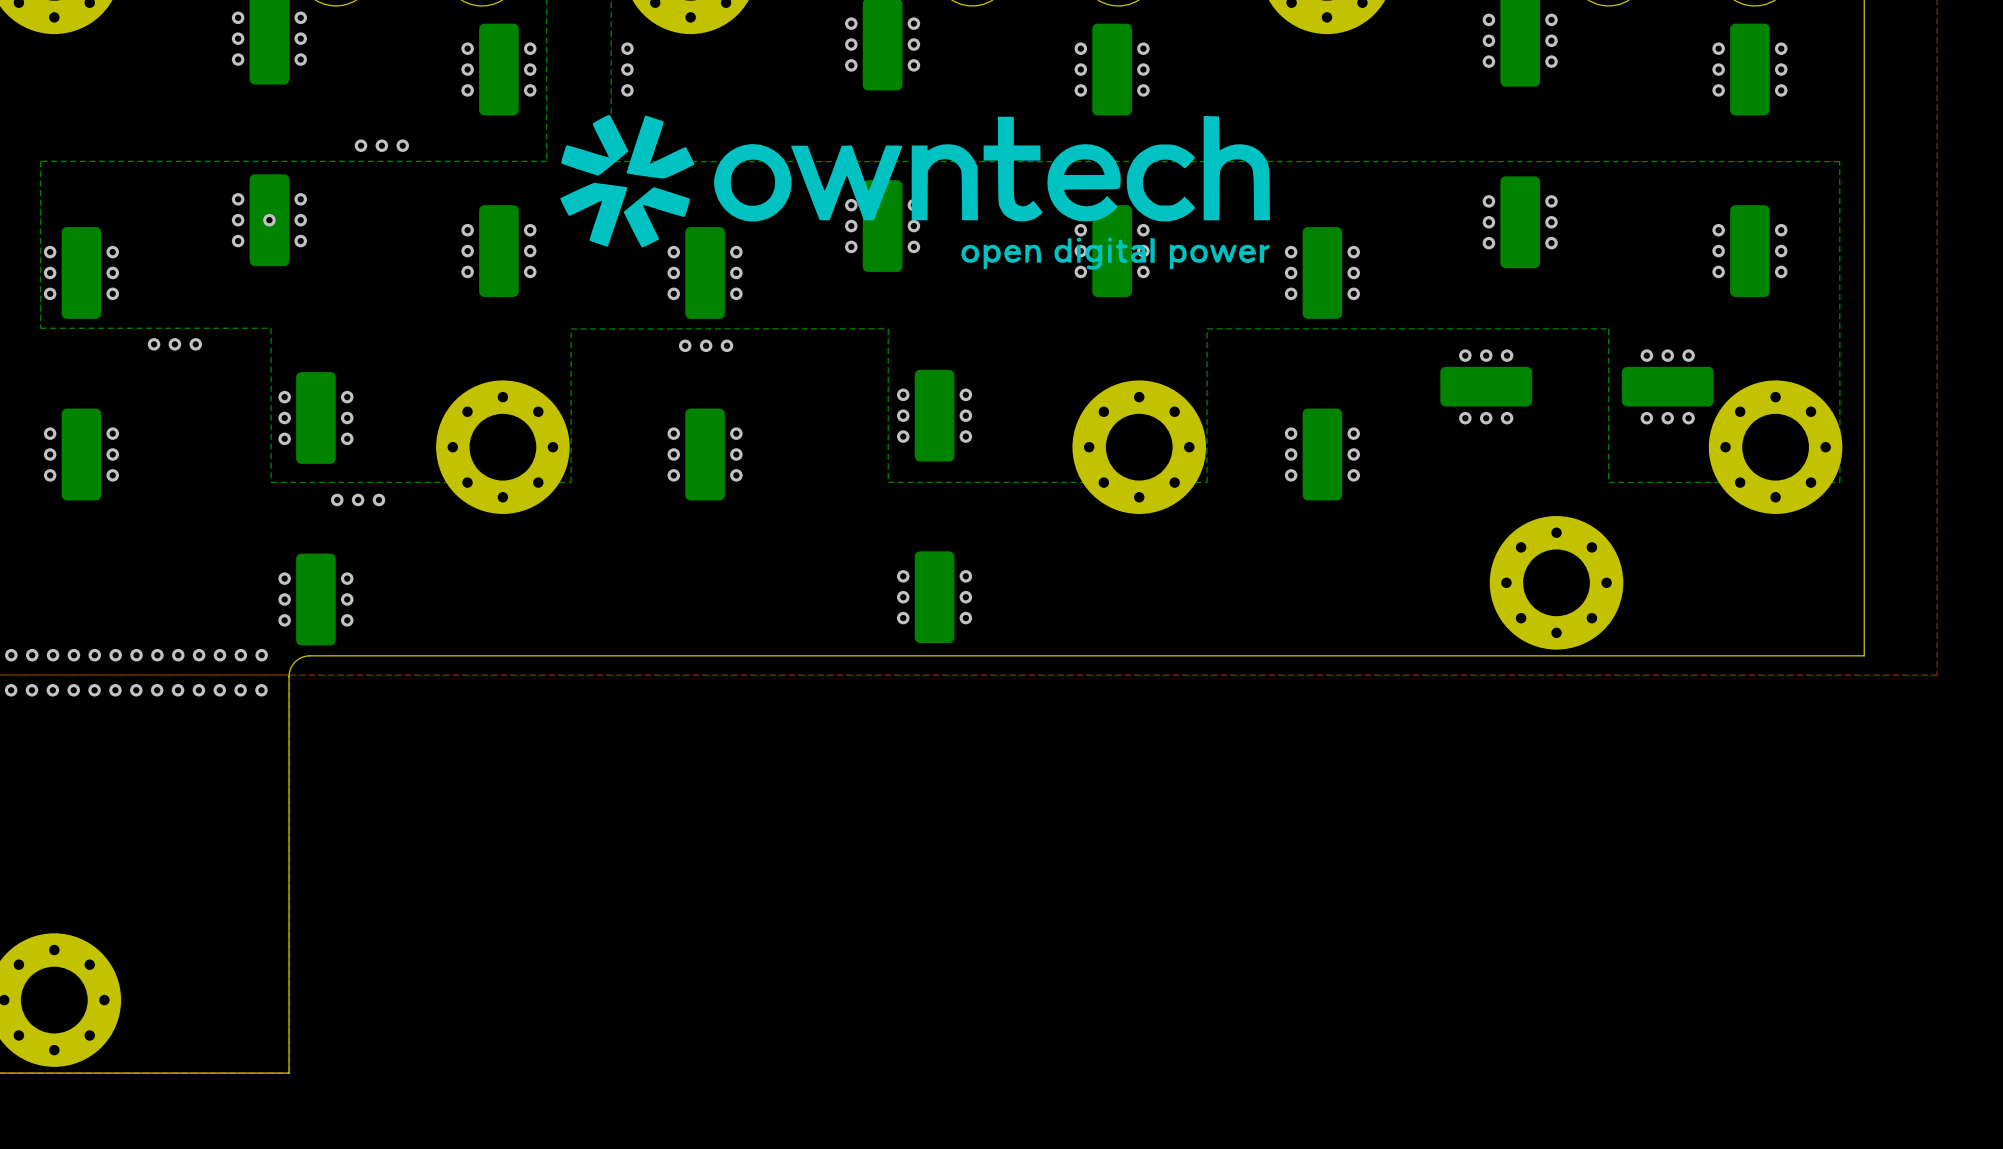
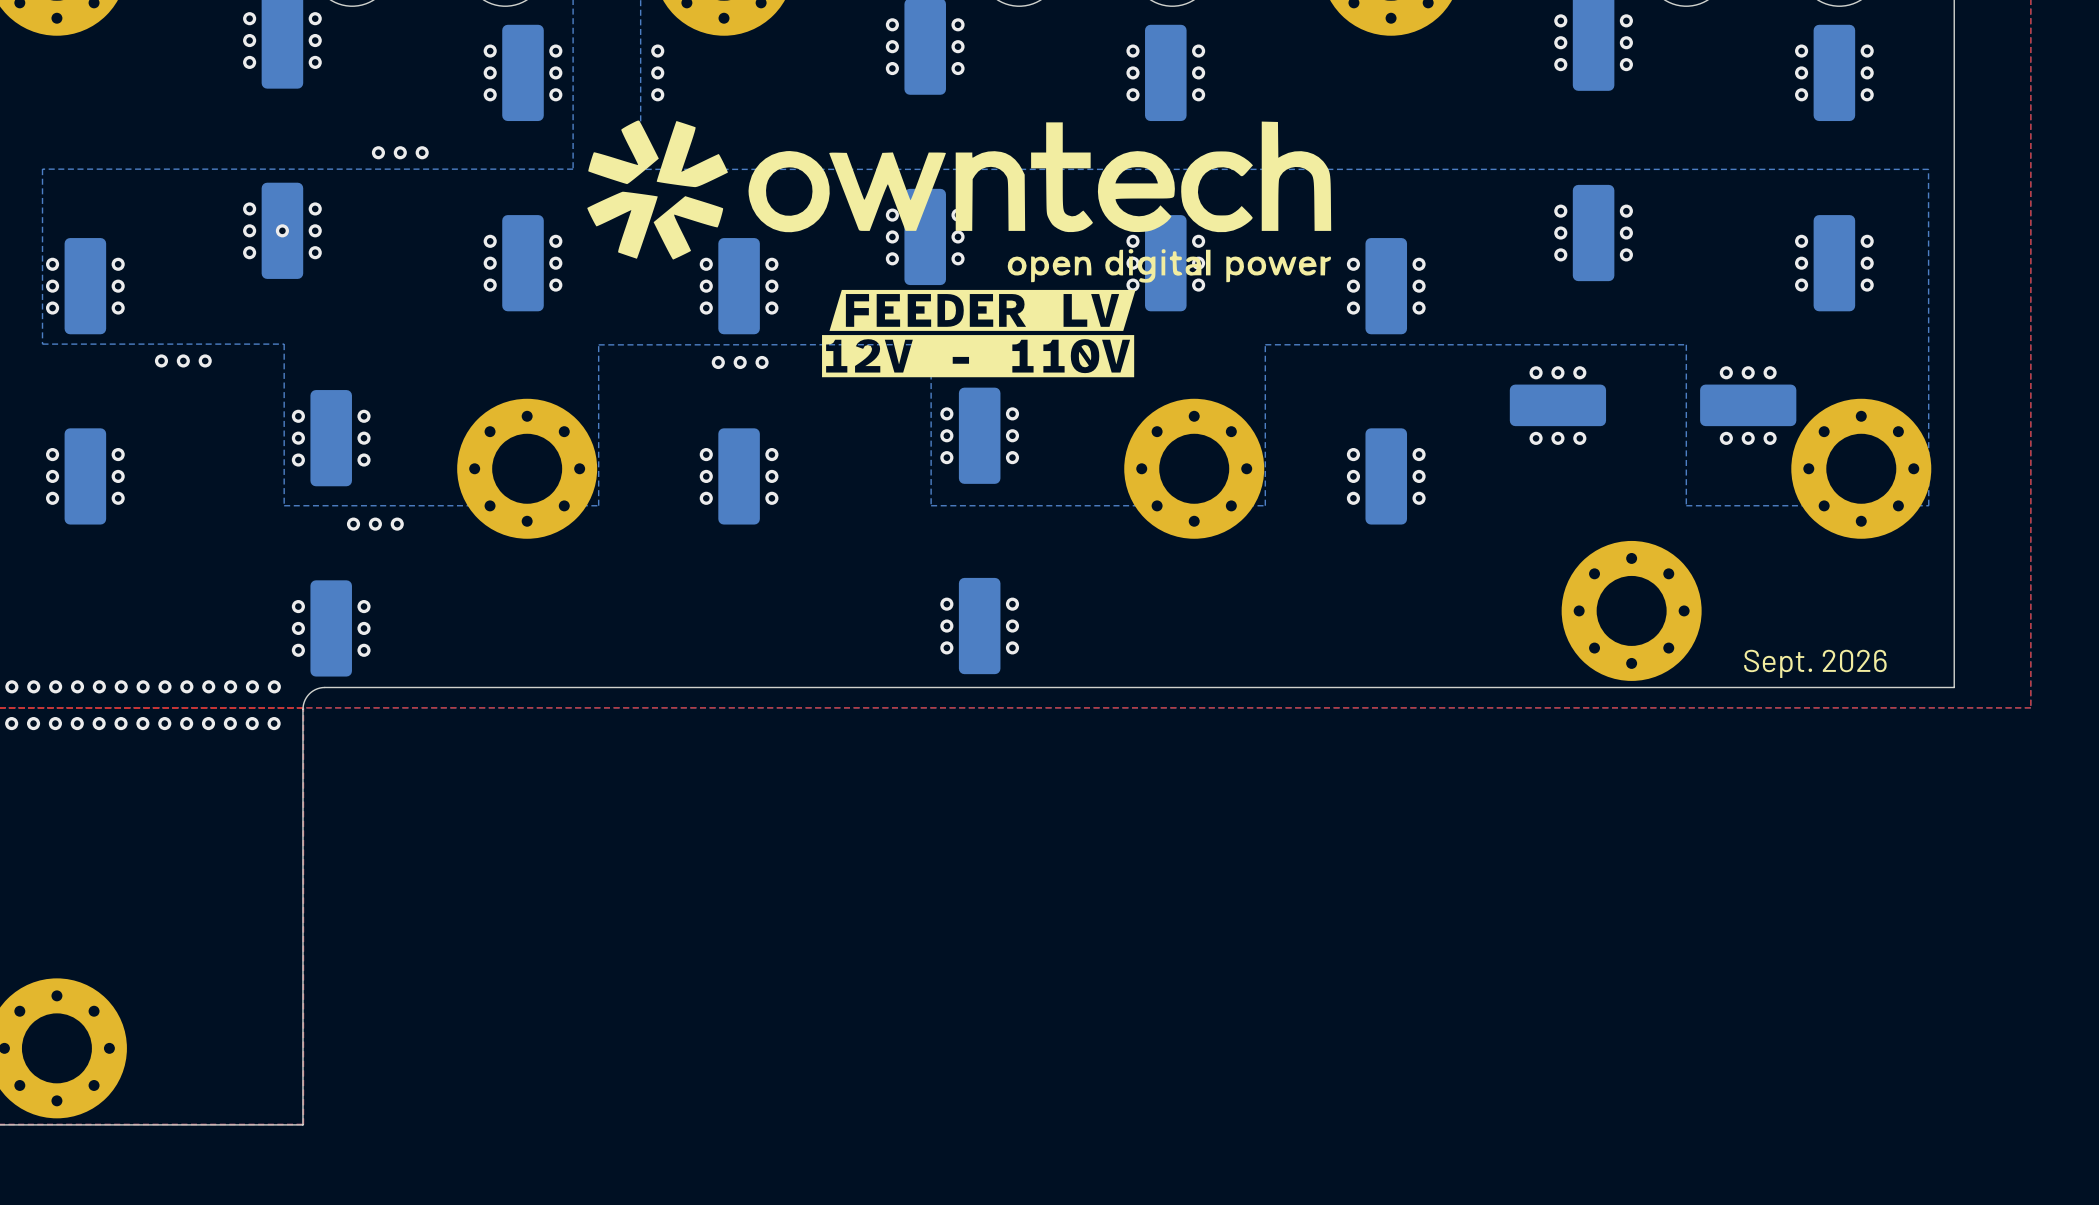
drawing: none -> [822, 289, 1136, 378]
text: none -> Sept. 2026 (1815, 663)

